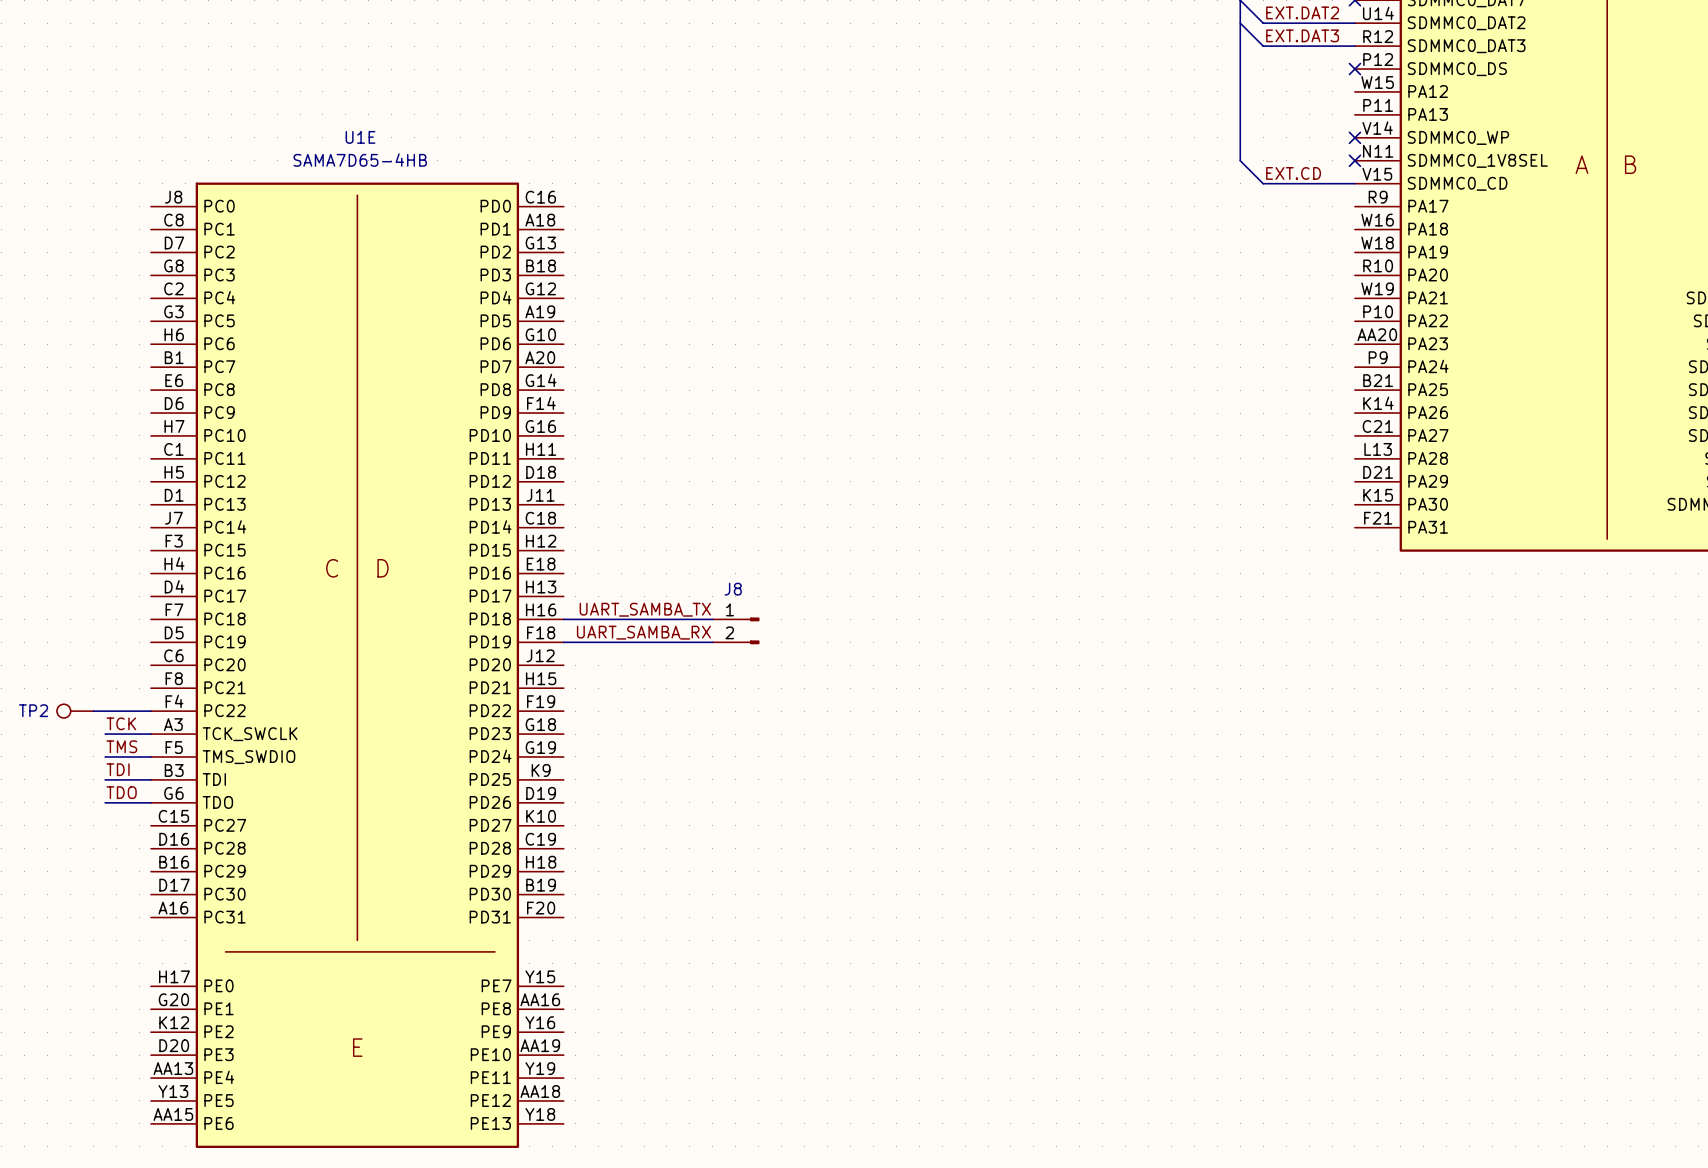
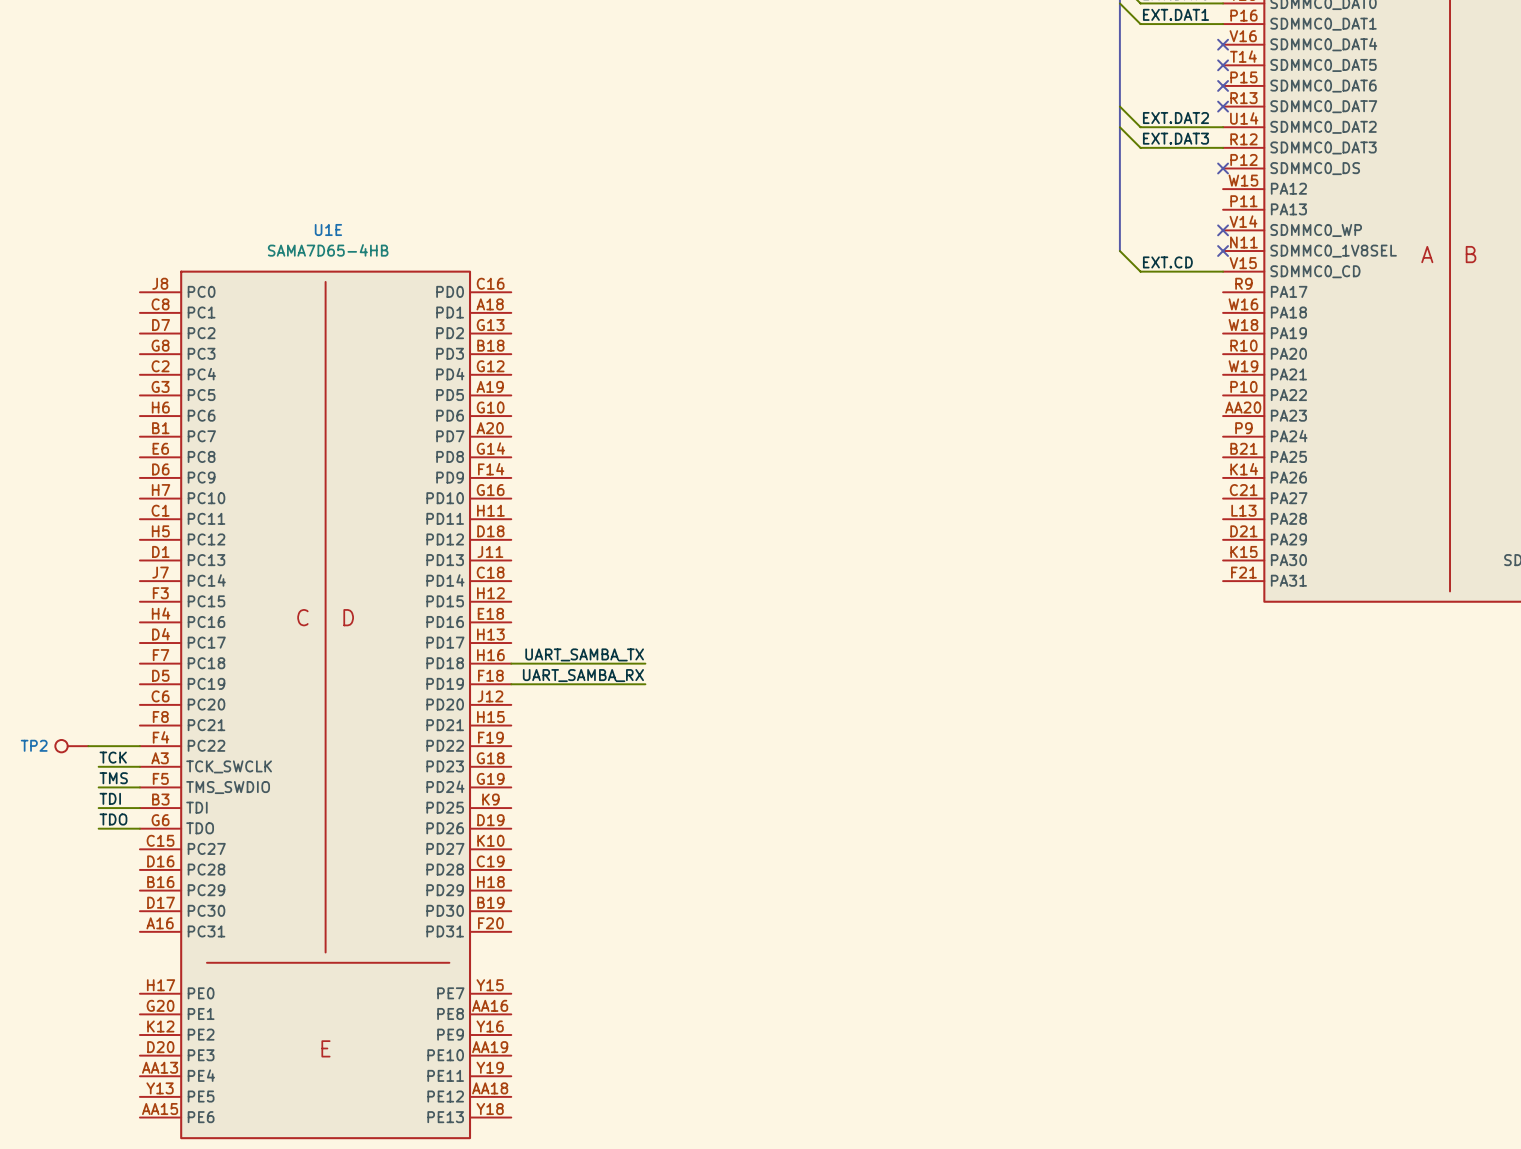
J8: (736, 630) -> none

